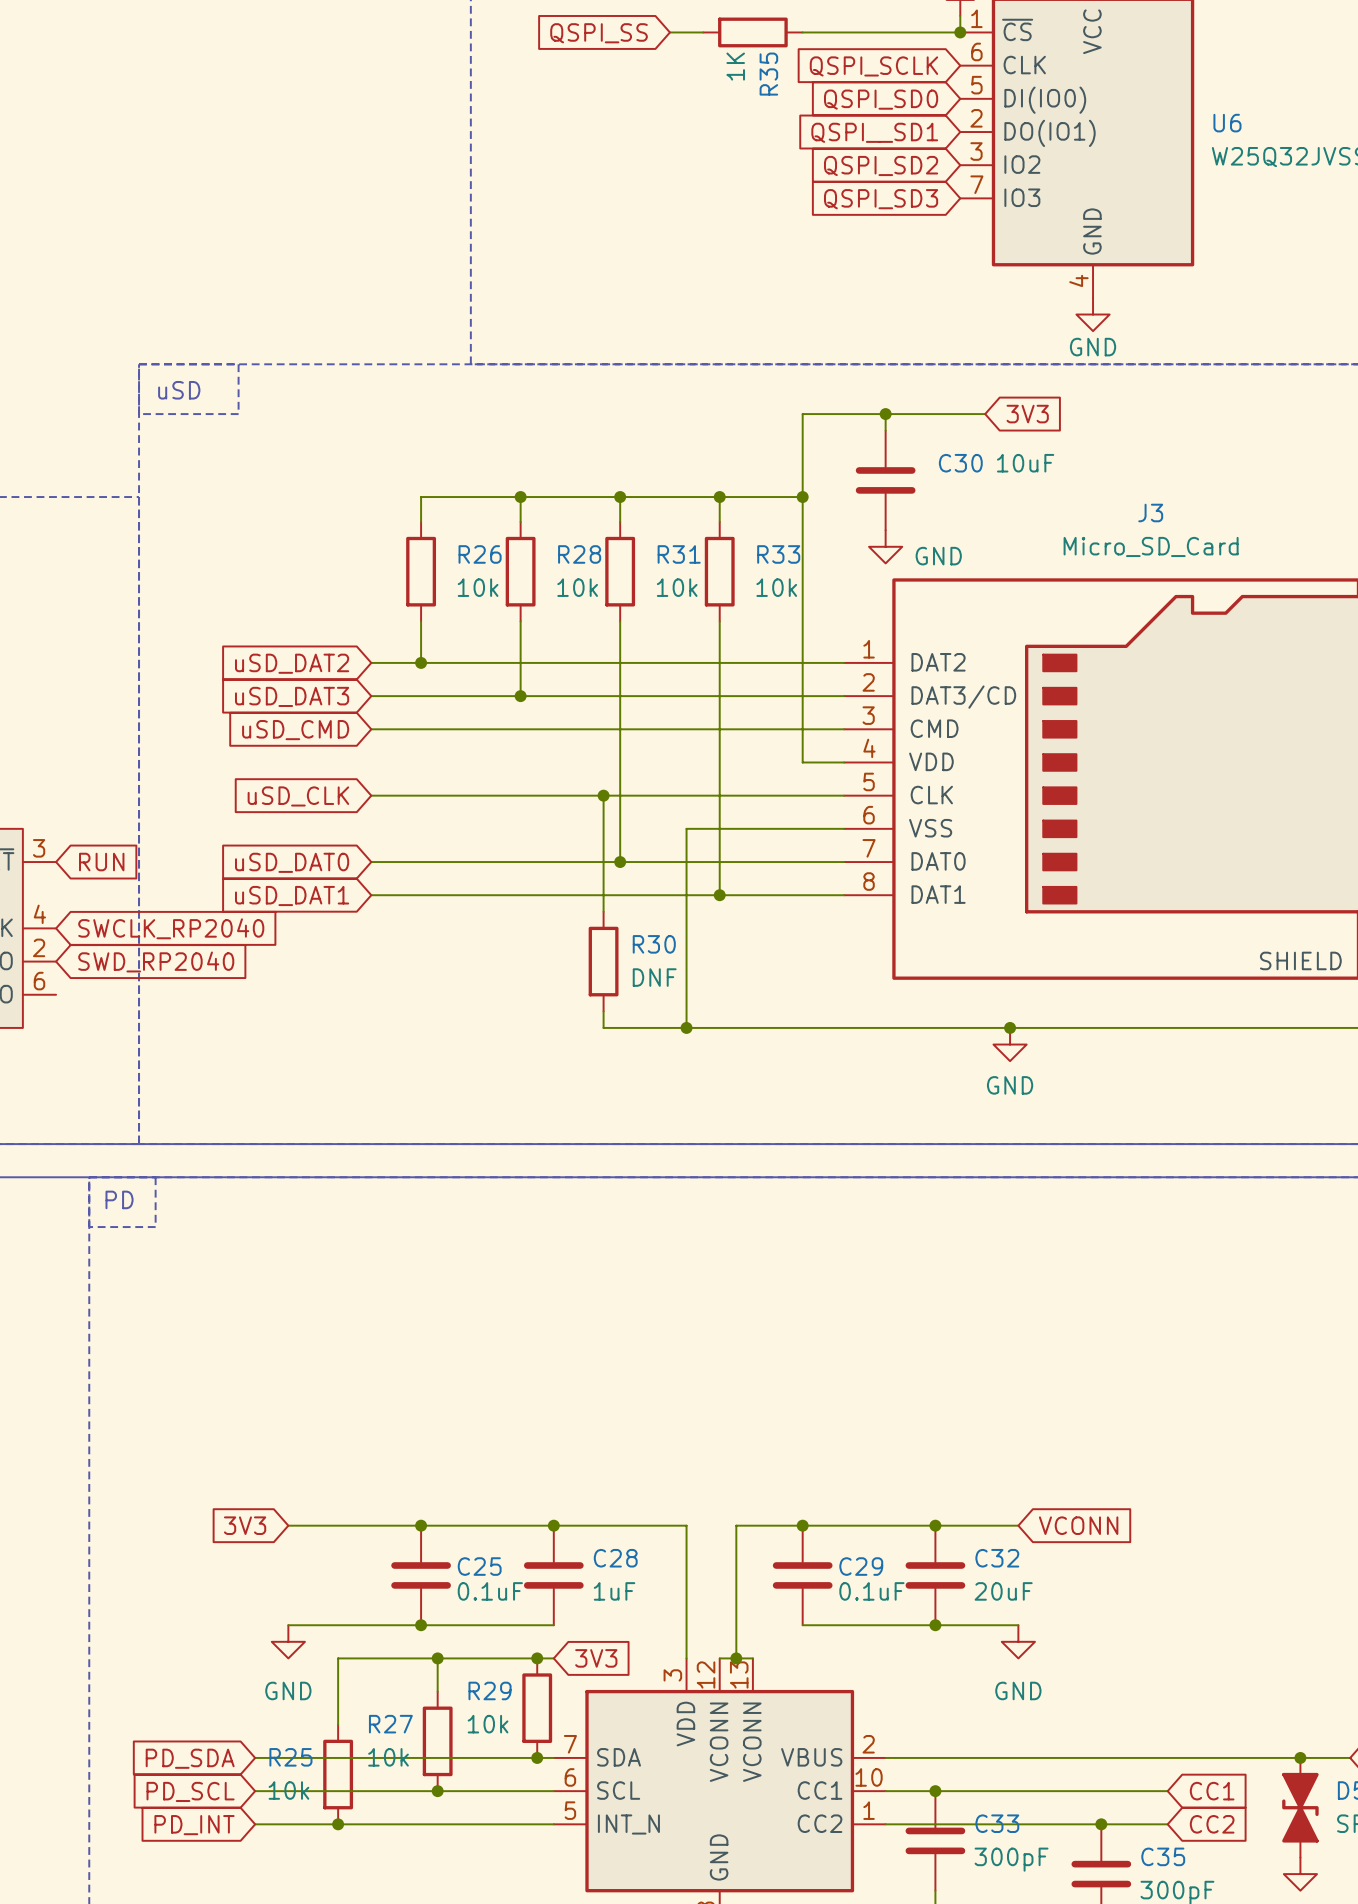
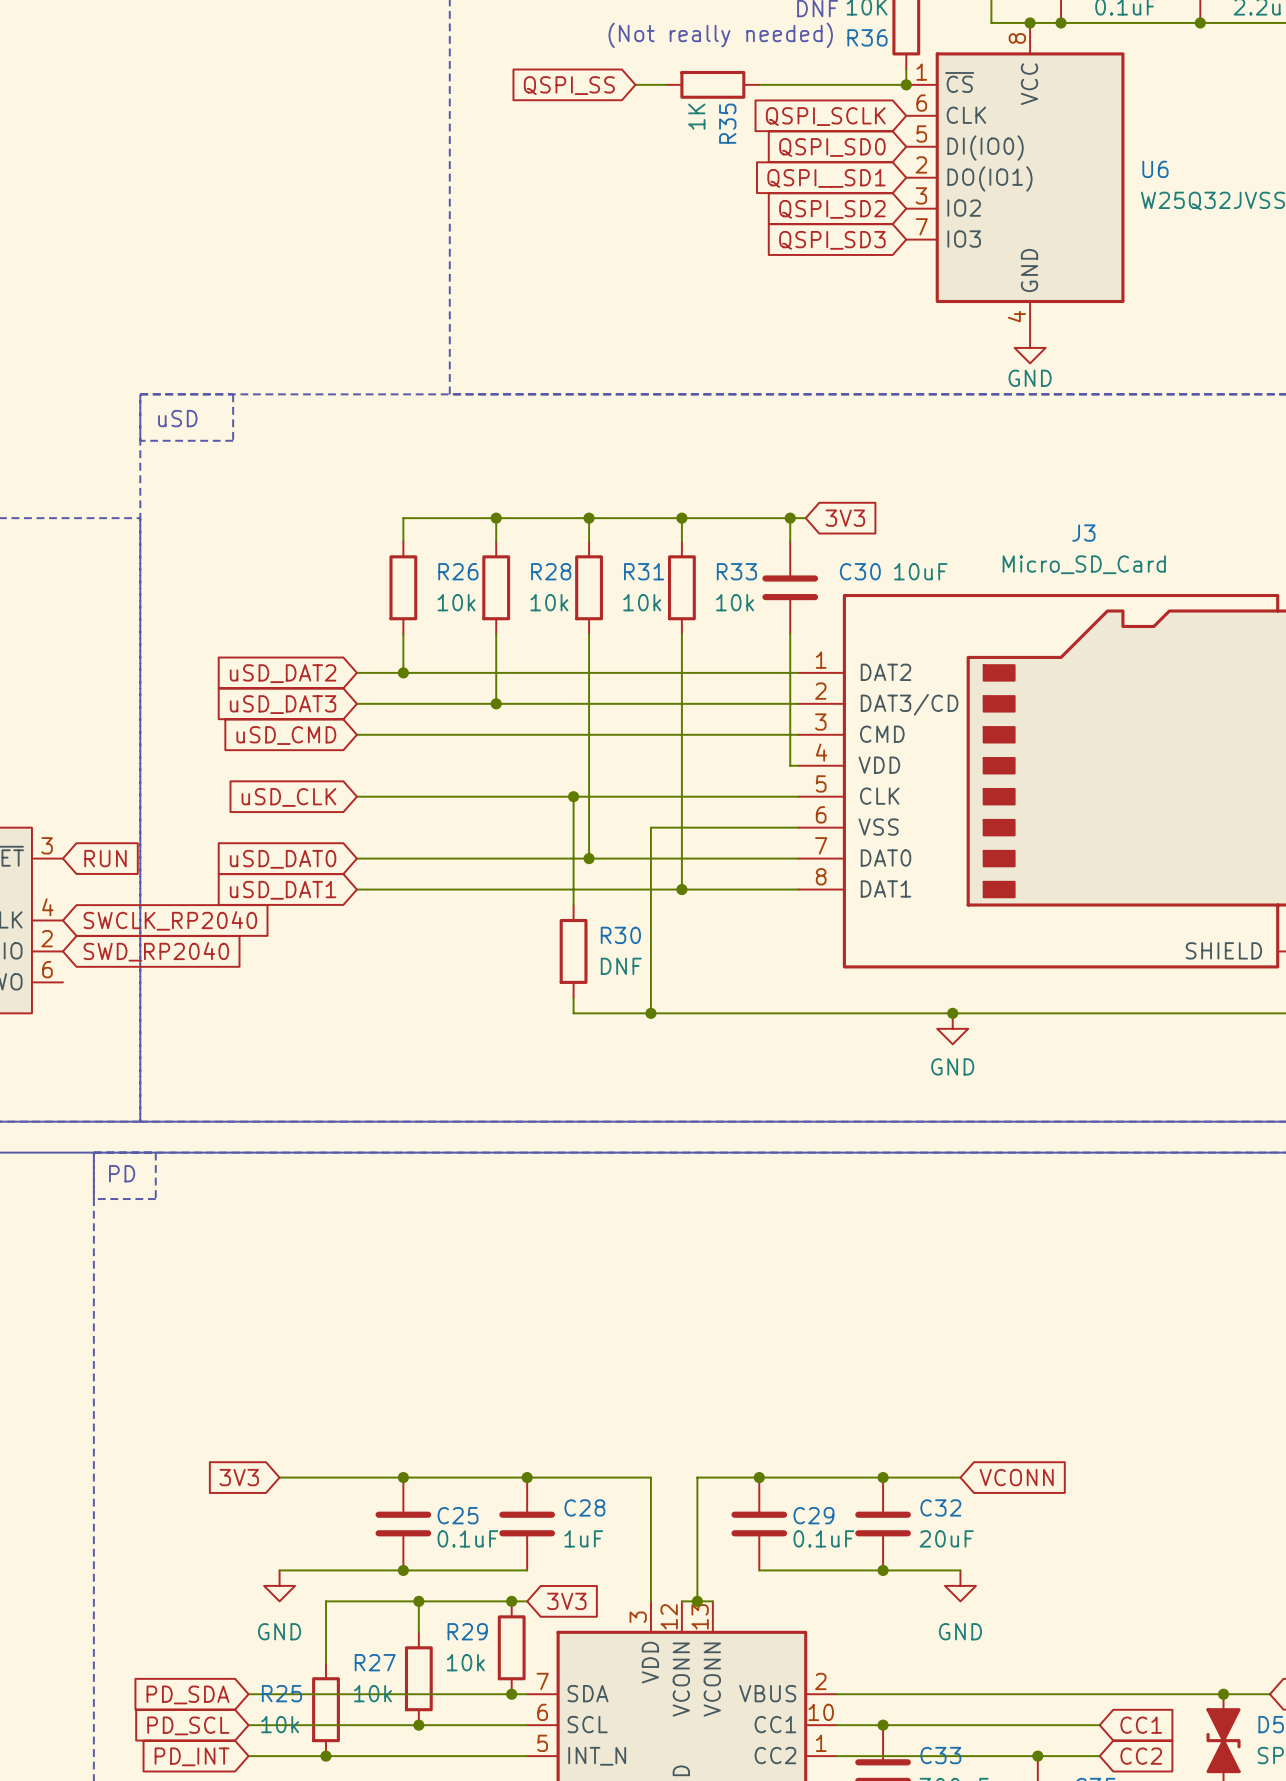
wire: (885, 414) (885, 430) -> none
junction: (885, 414) -> none
wire: (985, 414) (802, 414) (802, 762) (835, 762) -> (790, 634) (790, 765)
global label position: 3V3 (1027, 414) -> 3V3 (845, 518)
C30 position: (885, 480) -> (790, 587)
wire: none -> (759, 518) (805, 518)
junction position: (802, 497) -> (790, 518)
wire: none -> (790, 518) (790, 541)
power symbol: GND (885, 546) -> none

